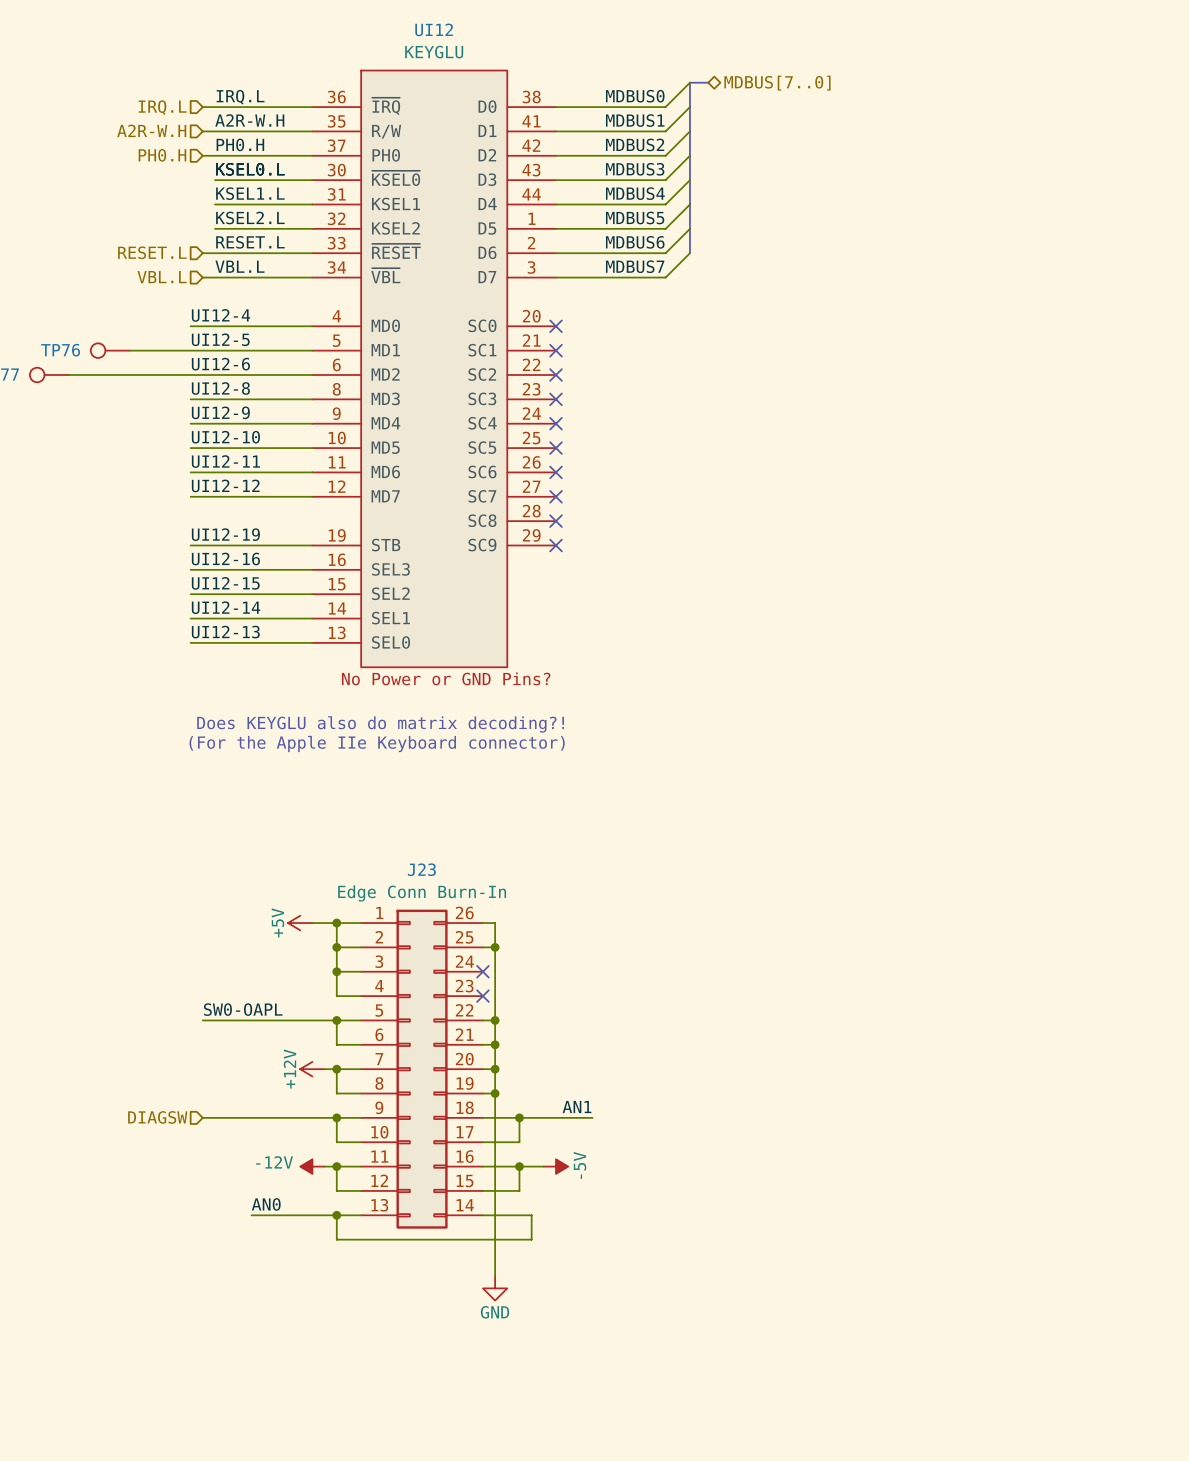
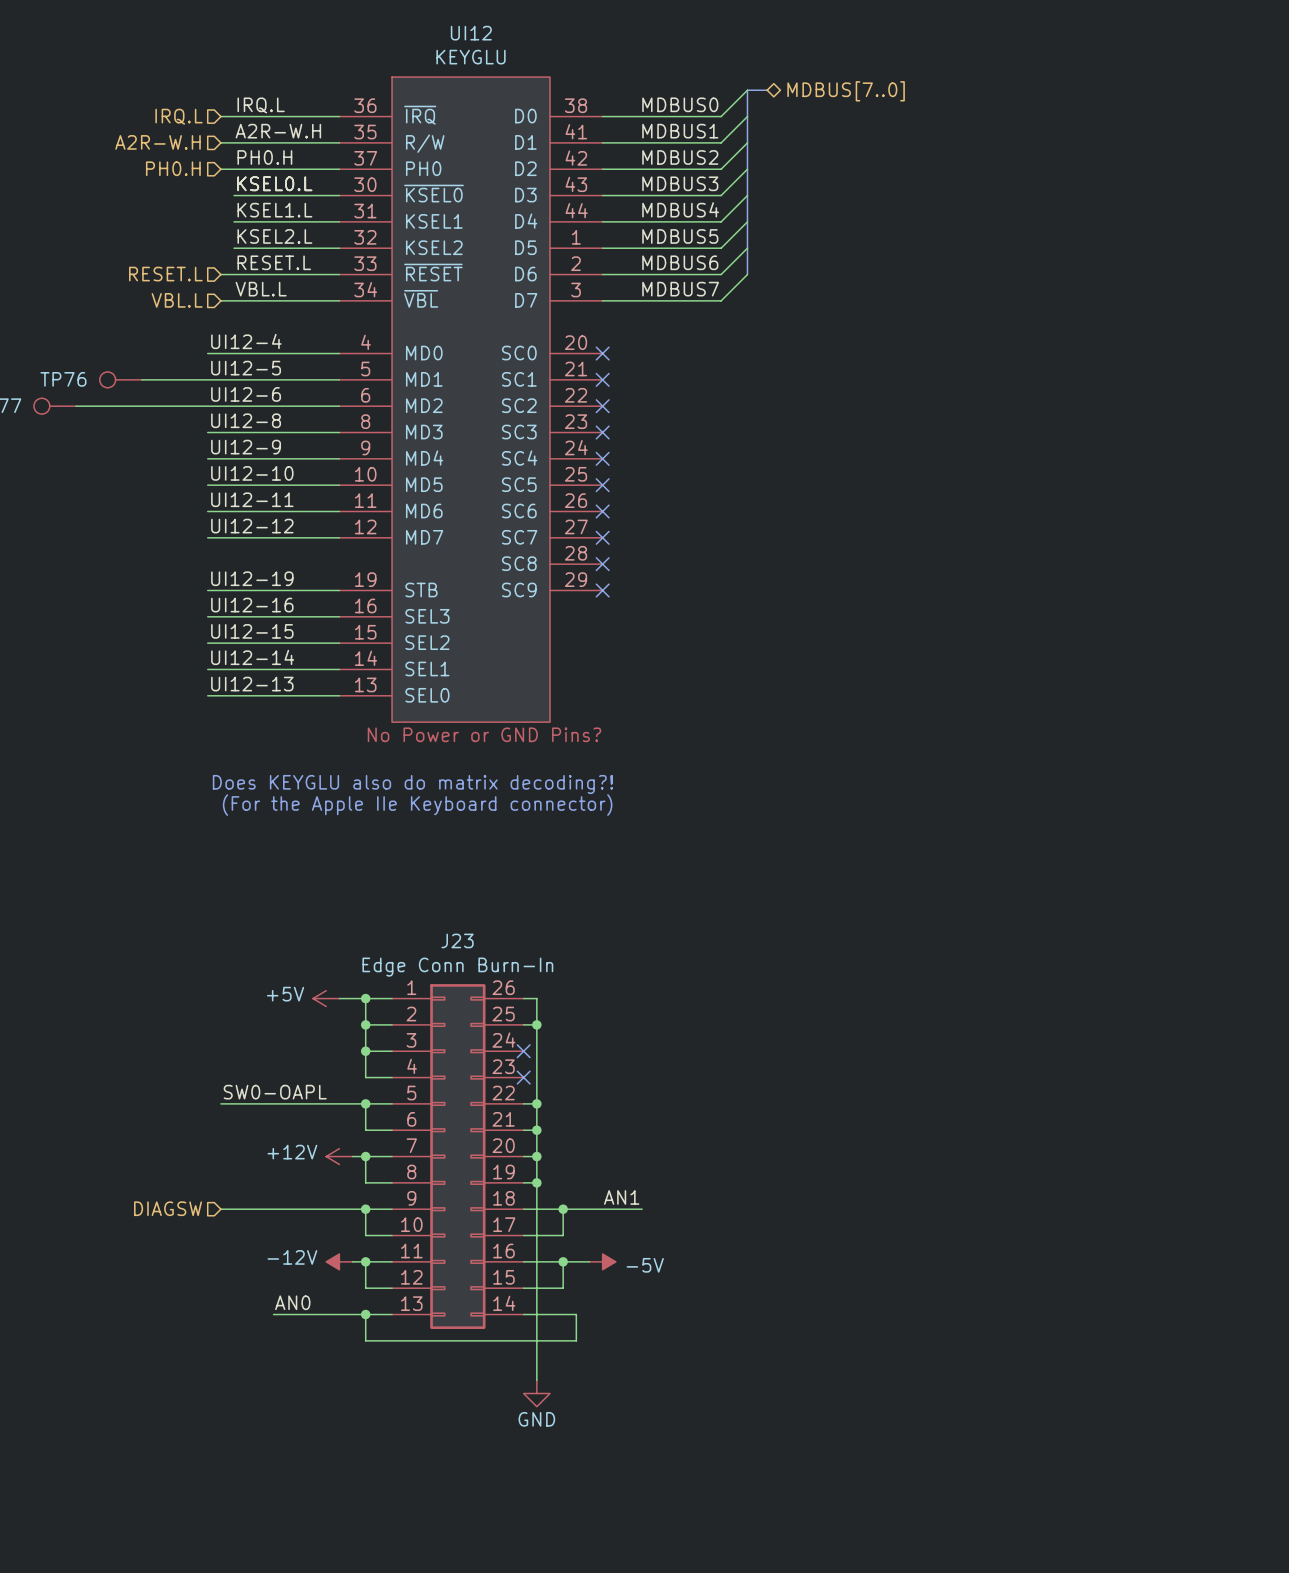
power symbol text rotation: 0° (278, 922) -> 90° clockwise (285, 994)
power symbol text rotation: 0° (289, 1069) -> 90° clockwise (292, 1152)
power symbol text rotation: 0° (580, 1165) -> 90° clockwise (645, 1265)

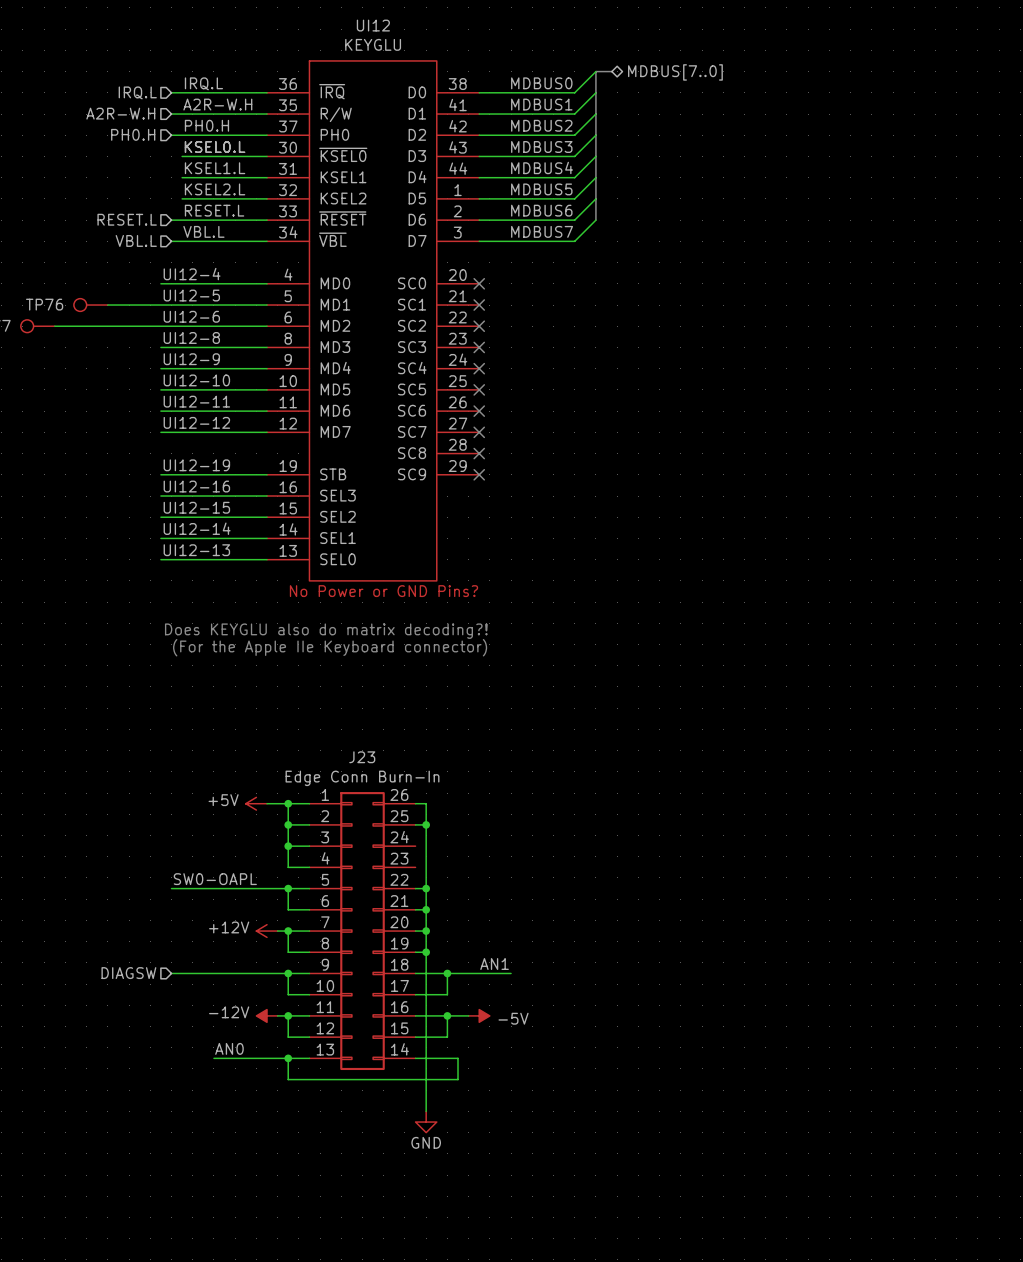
no-connect mark: (523, 1051) -> none
no-connect mark: (523, 1077) -> none

